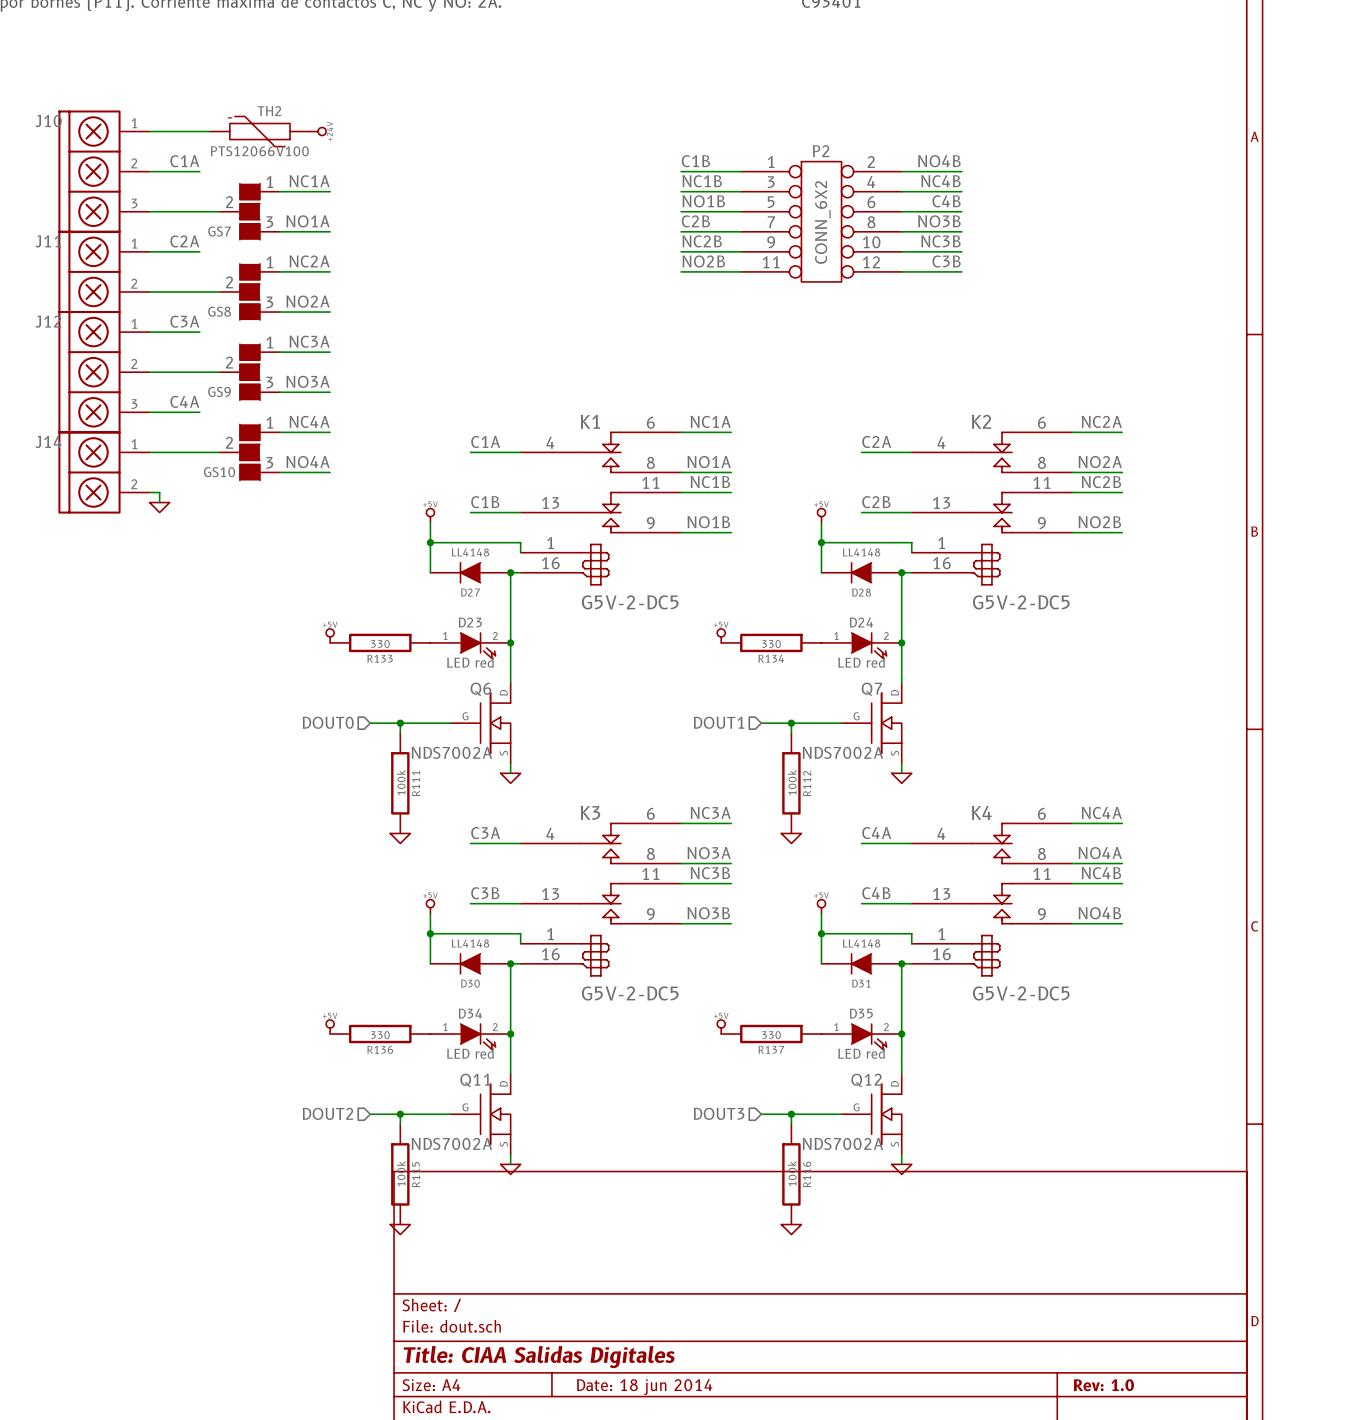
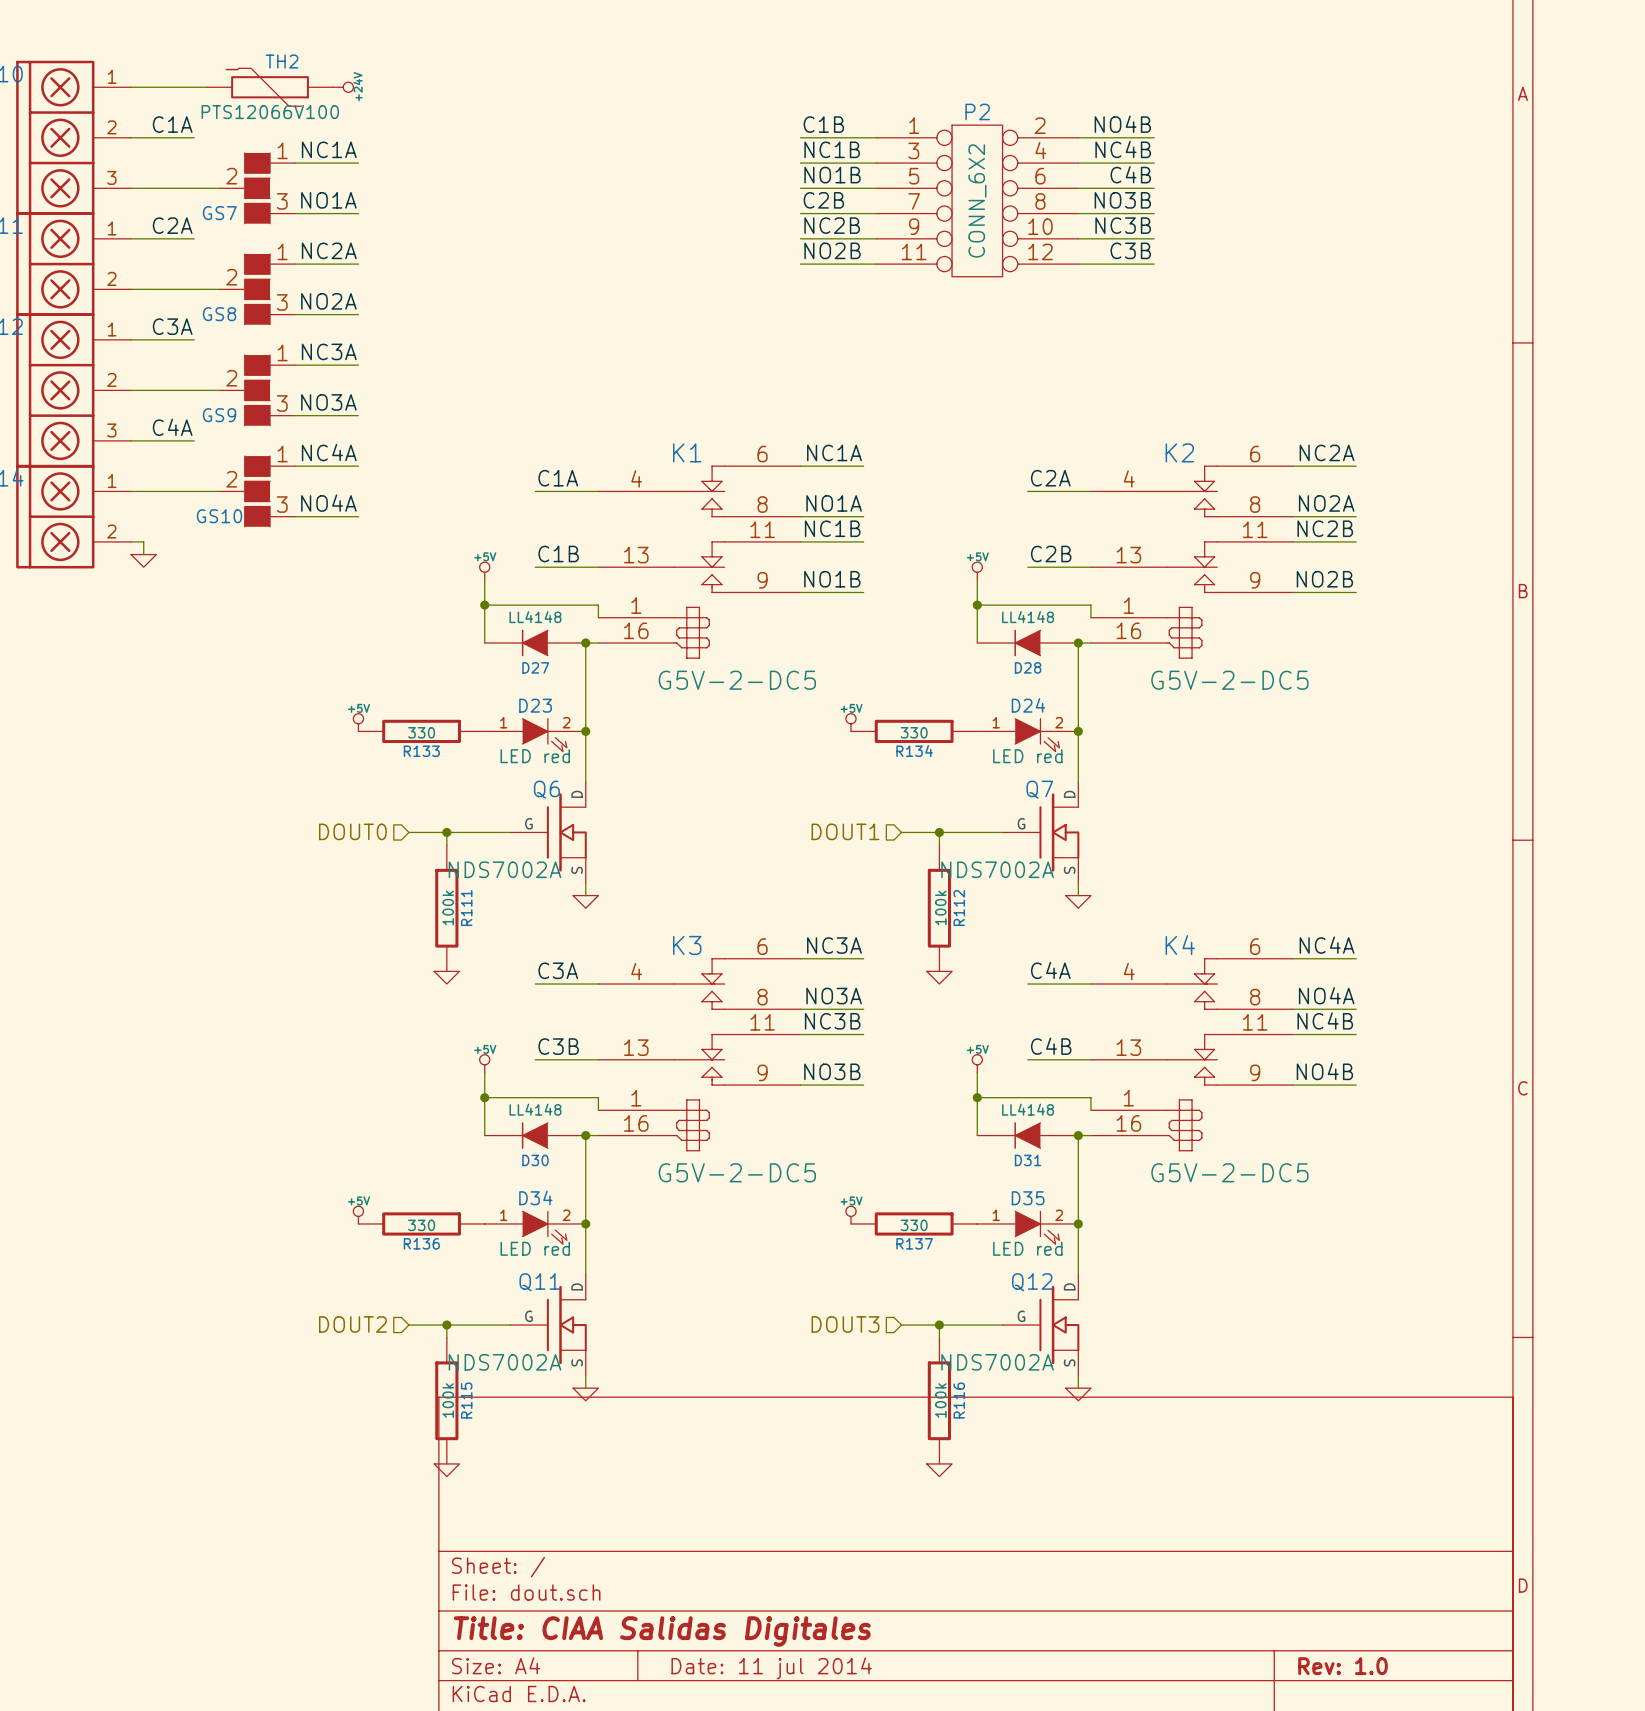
title block: Date: 18 jun 2014 (644, 1387) -> Date: 11 jul 2014 (771, 1668)

